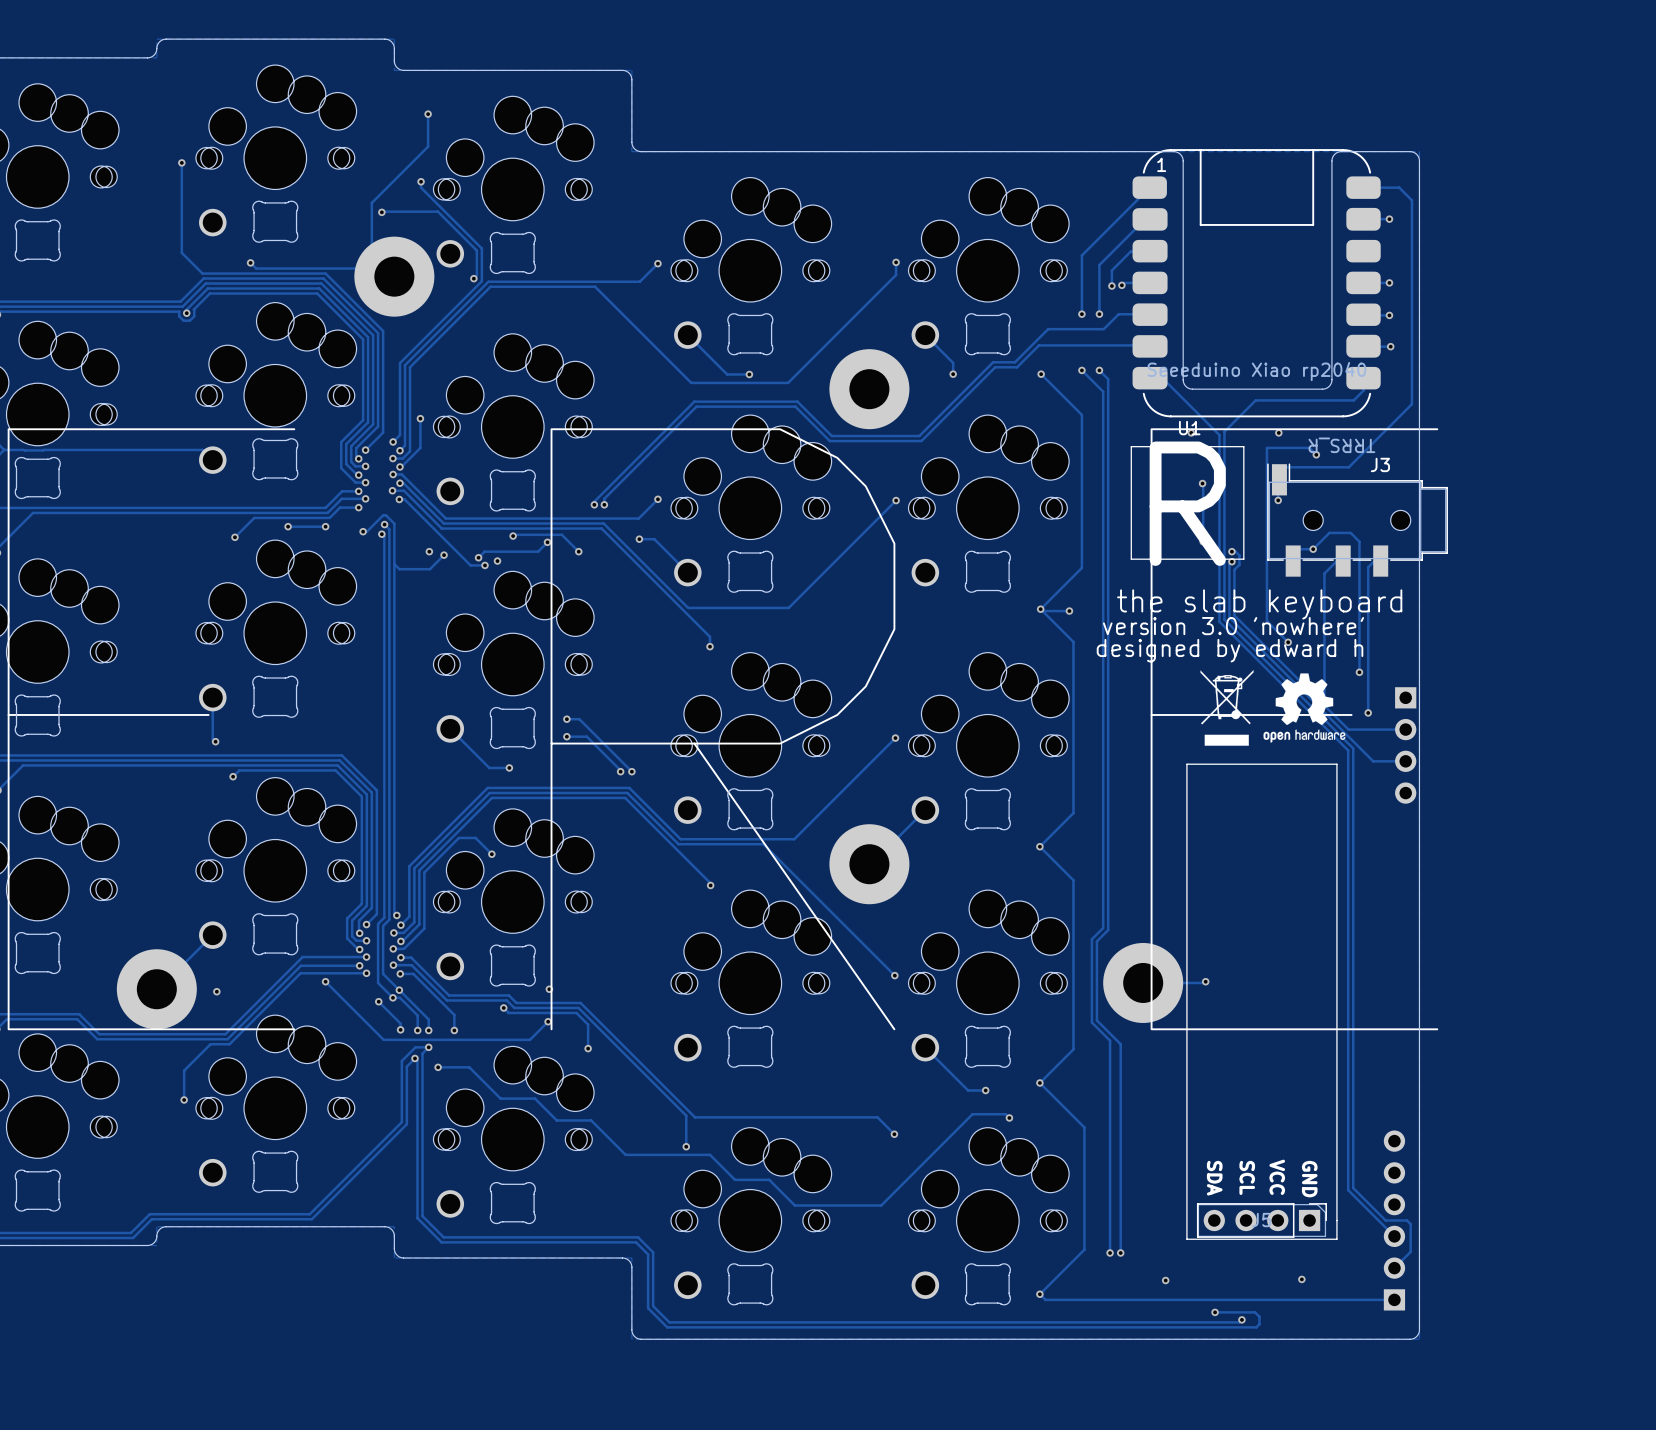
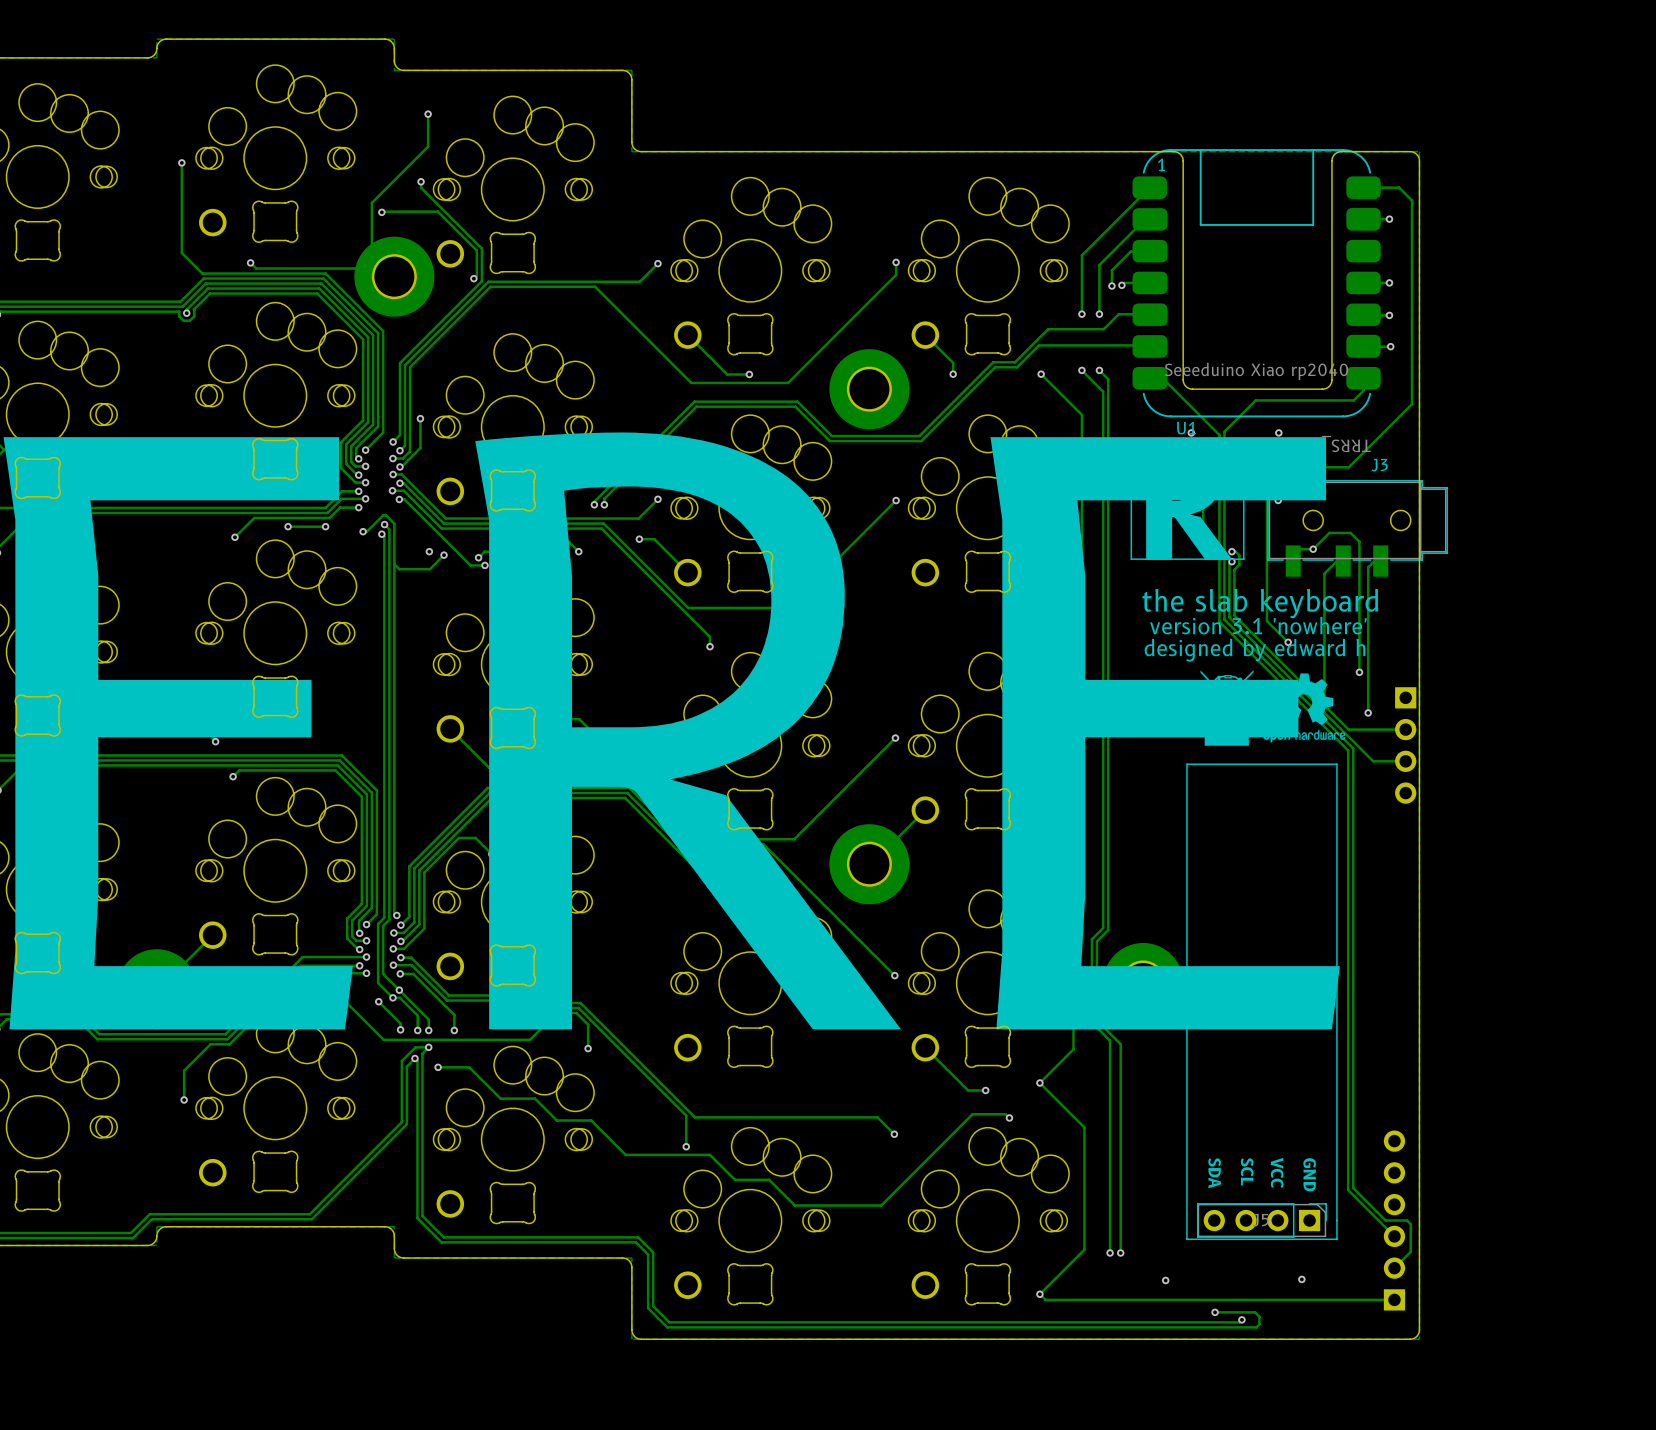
text: version 3.0 'nowhere' (1233, 626) -> version 3.1 'nowhere' (1258, 625)

